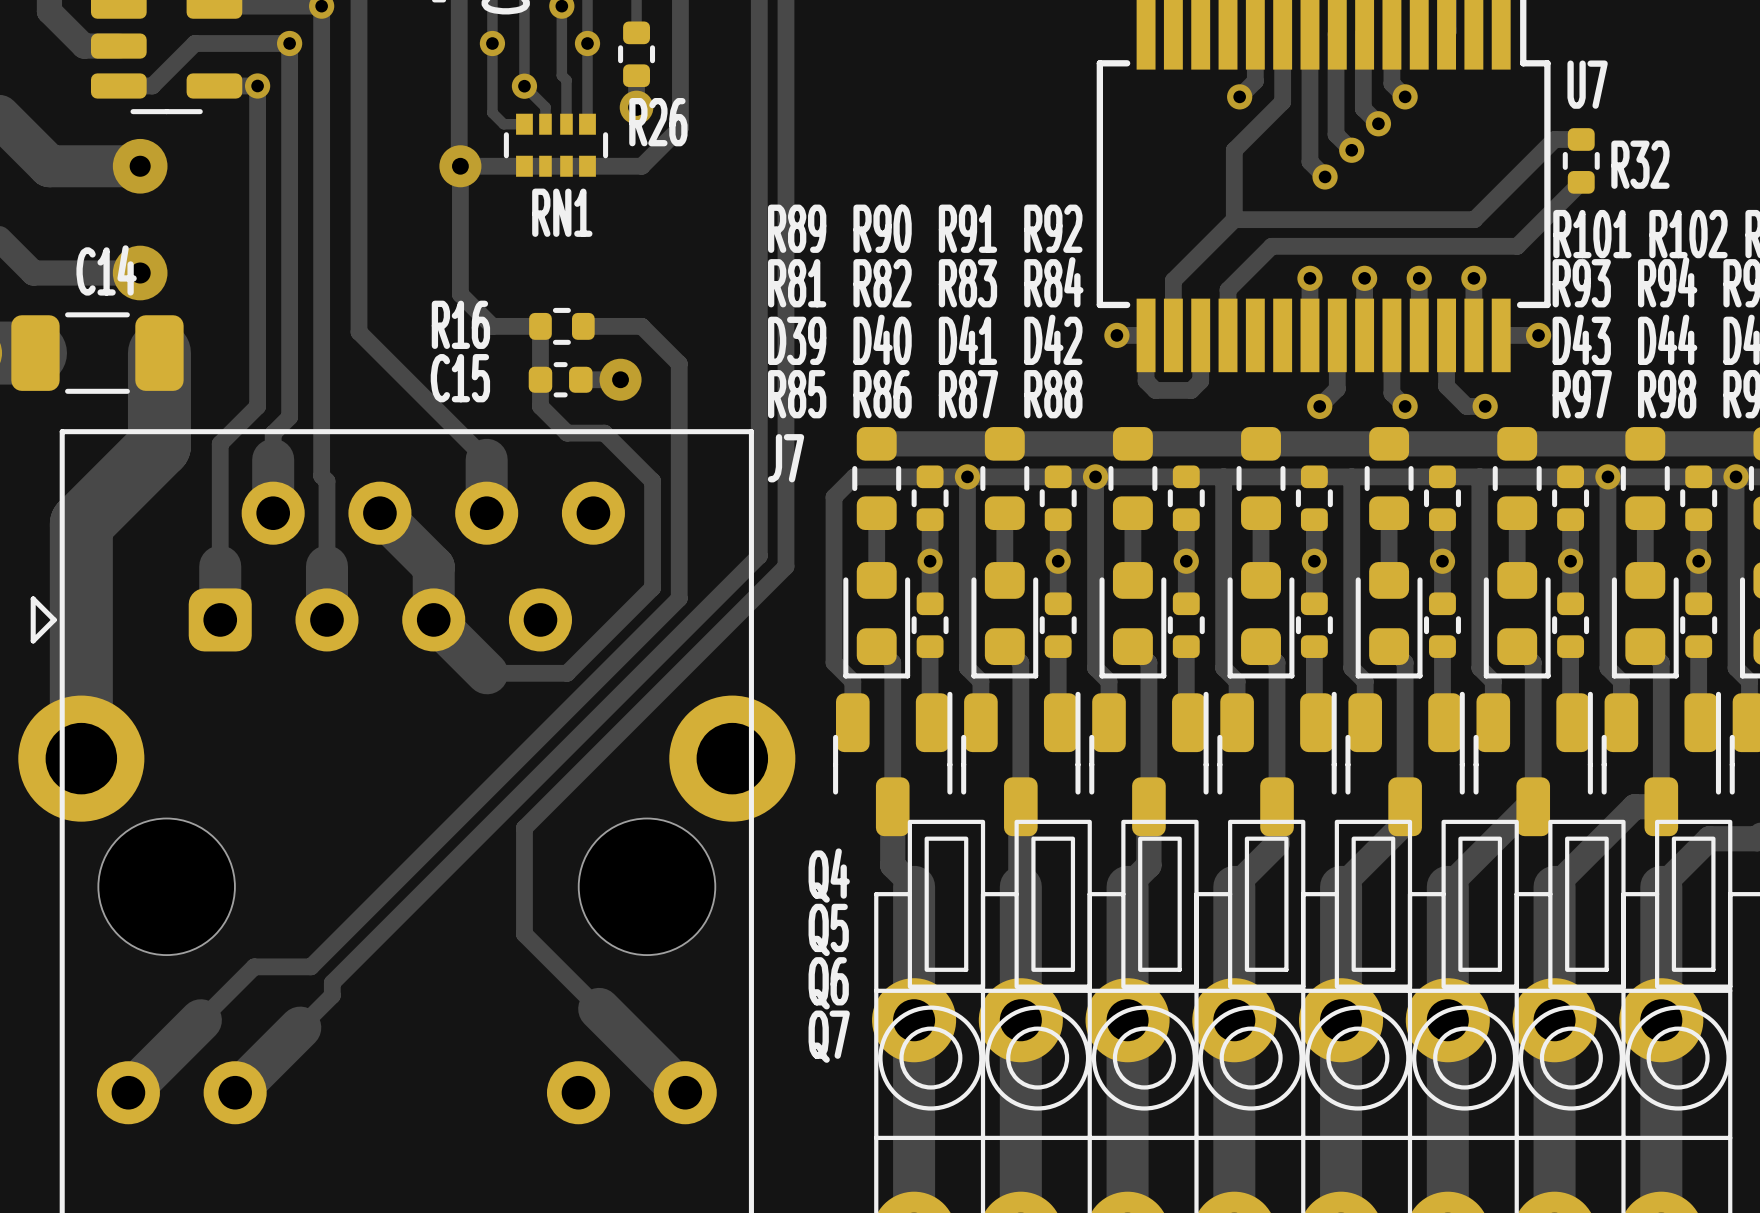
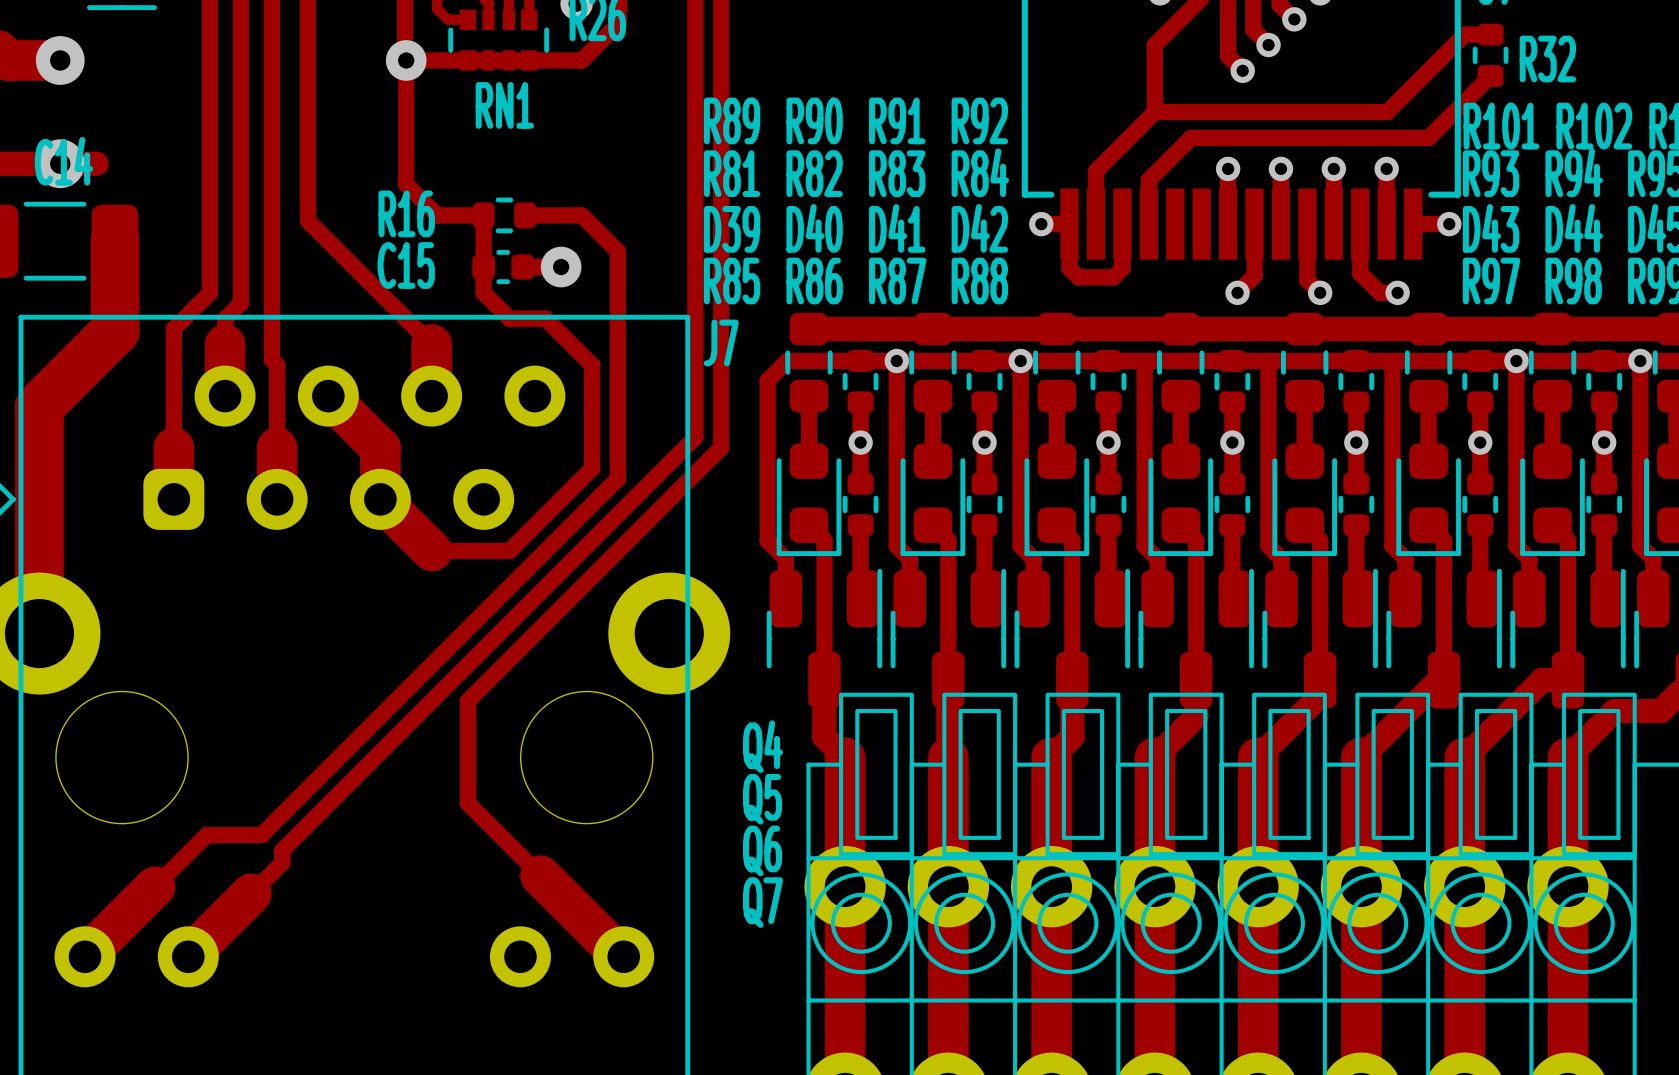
via position: (140, 166) -> (60, 60)
via position: (140, 273) -> (60, 163)
track width: thick (159, 353) (159, 445) (81, 523) (81, 758) -> thin (115, 241) (115, 330) (39, 406) (39, 633)

